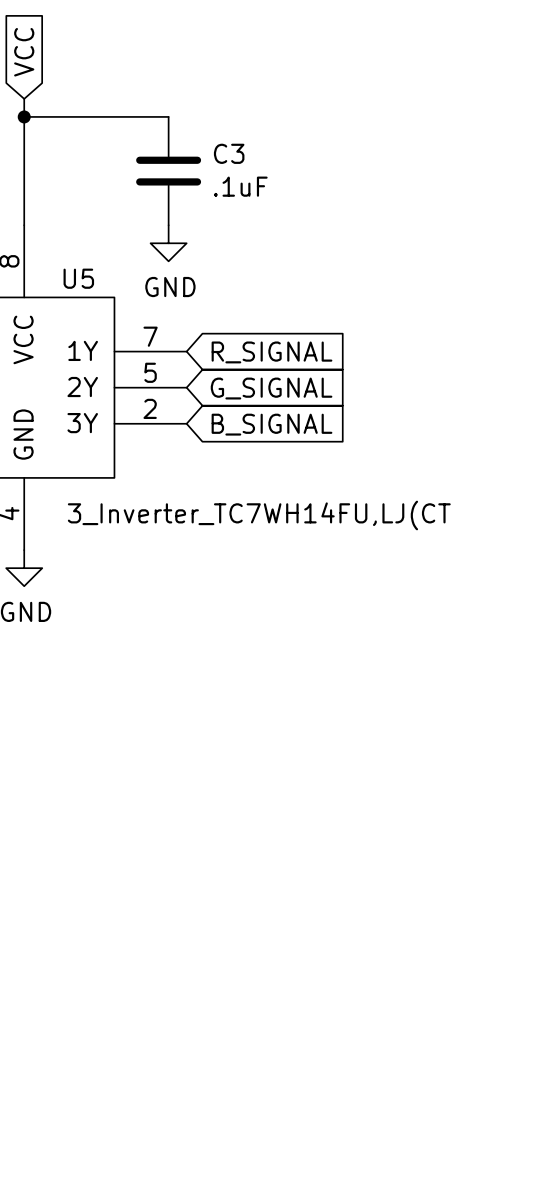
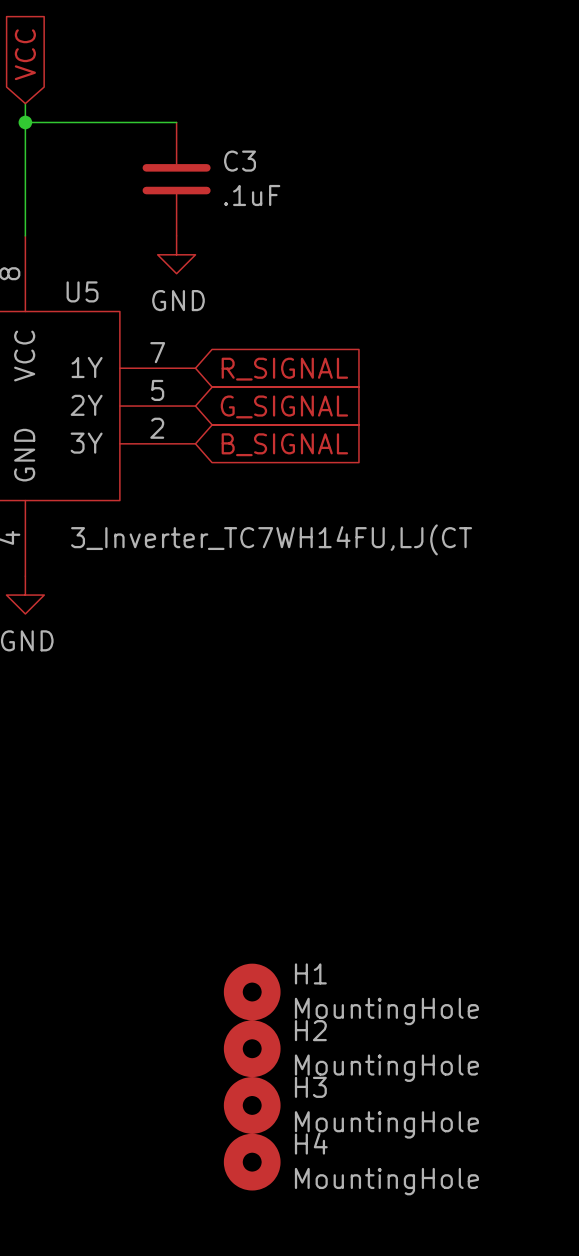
H1: none -> MountingHole (252, 992)
H2: none -> MountingHole (252, 1048)
H3: none -> MountingHole (252, 1105)
H4: none -> MountingHole (252, 1162)

